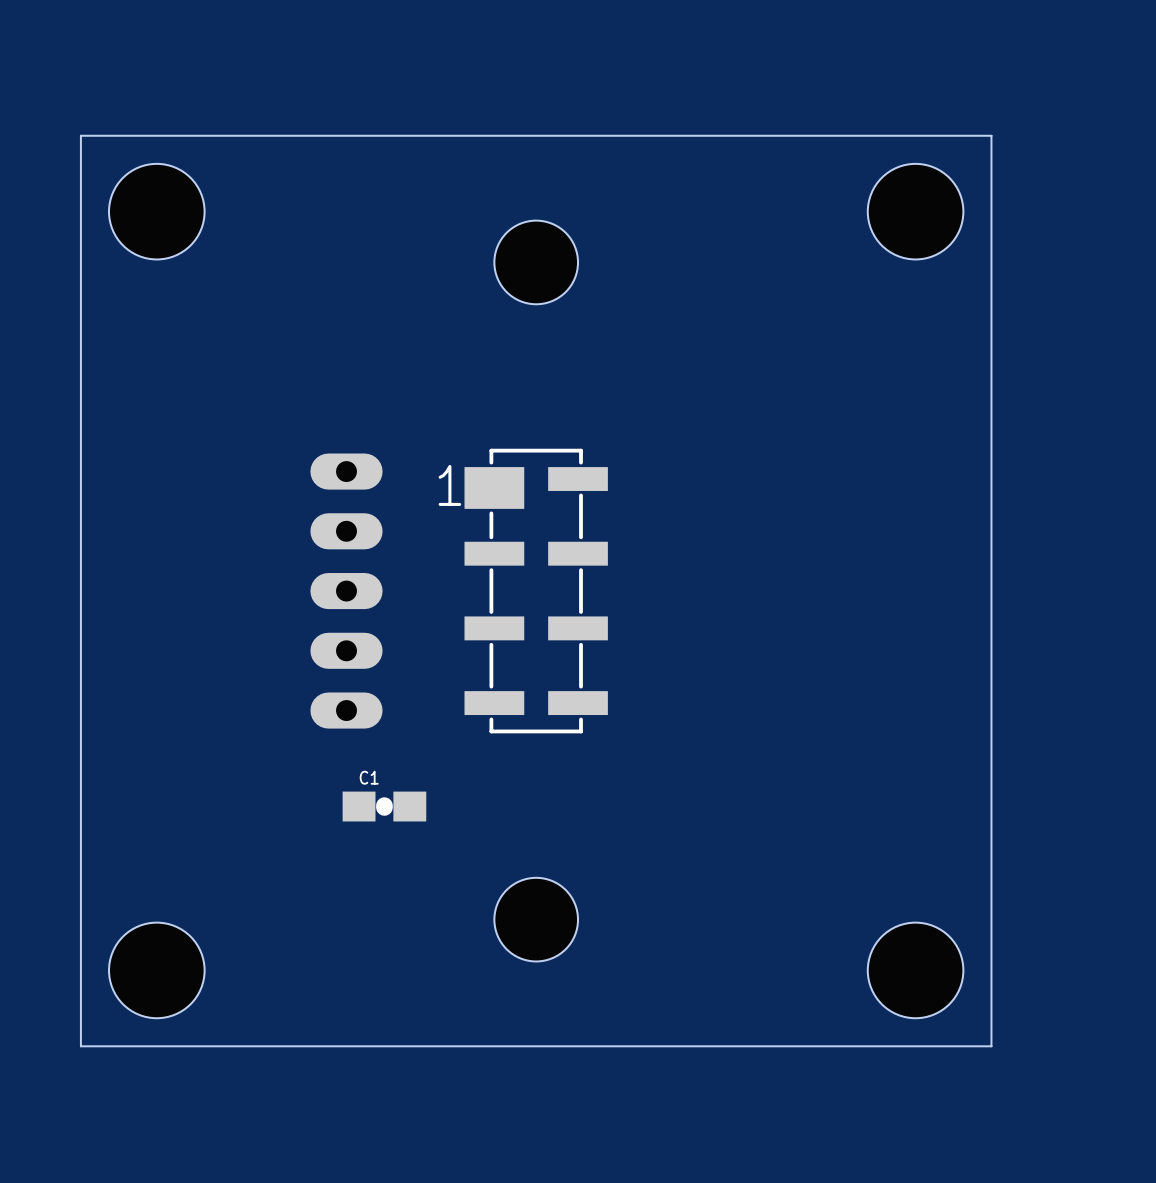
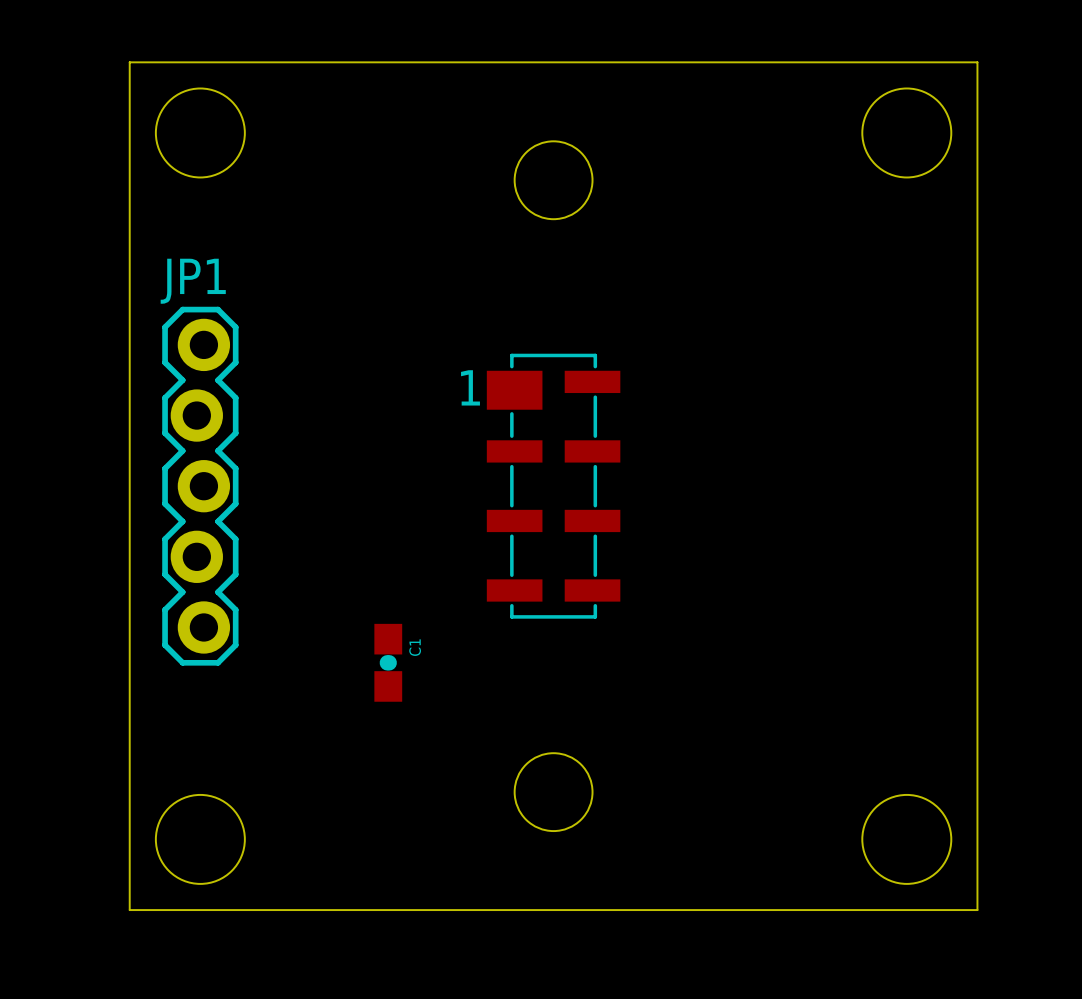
JP1: none -> (200, 486)
part: (346, 591) -> none
C1 rotation: 0° (384, 806) -> 90° clockwise (388, 662)

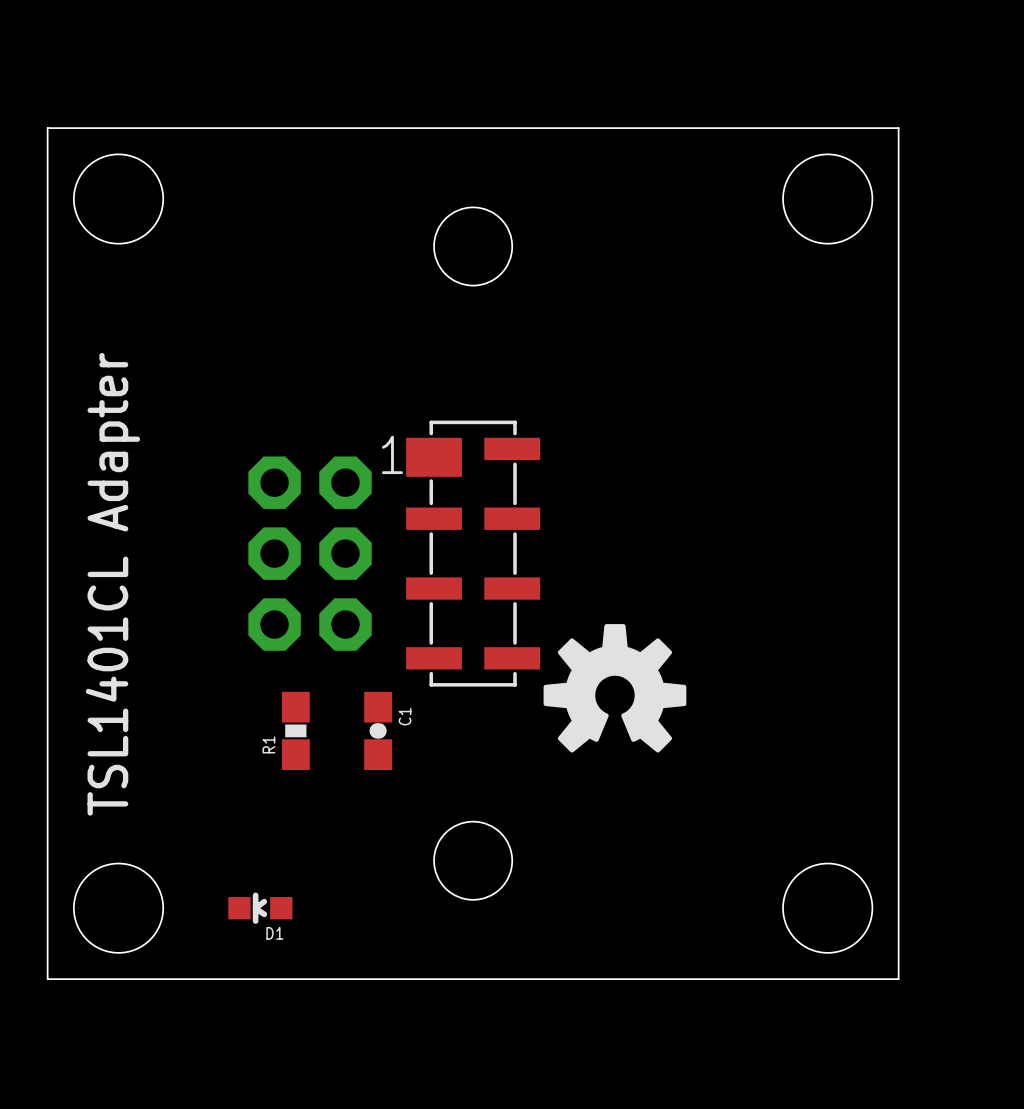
JP1: (200, 486) -> none
part: none -> (310, 553)
text: none -> TSL1401CL Adapter (112, 584)
drawing: none -> [543, 624, 687, 753]
R1: none -> (295, 730)
C1 position: (388, 662) -> (378, 730)
D1: none -> (260, 908)

